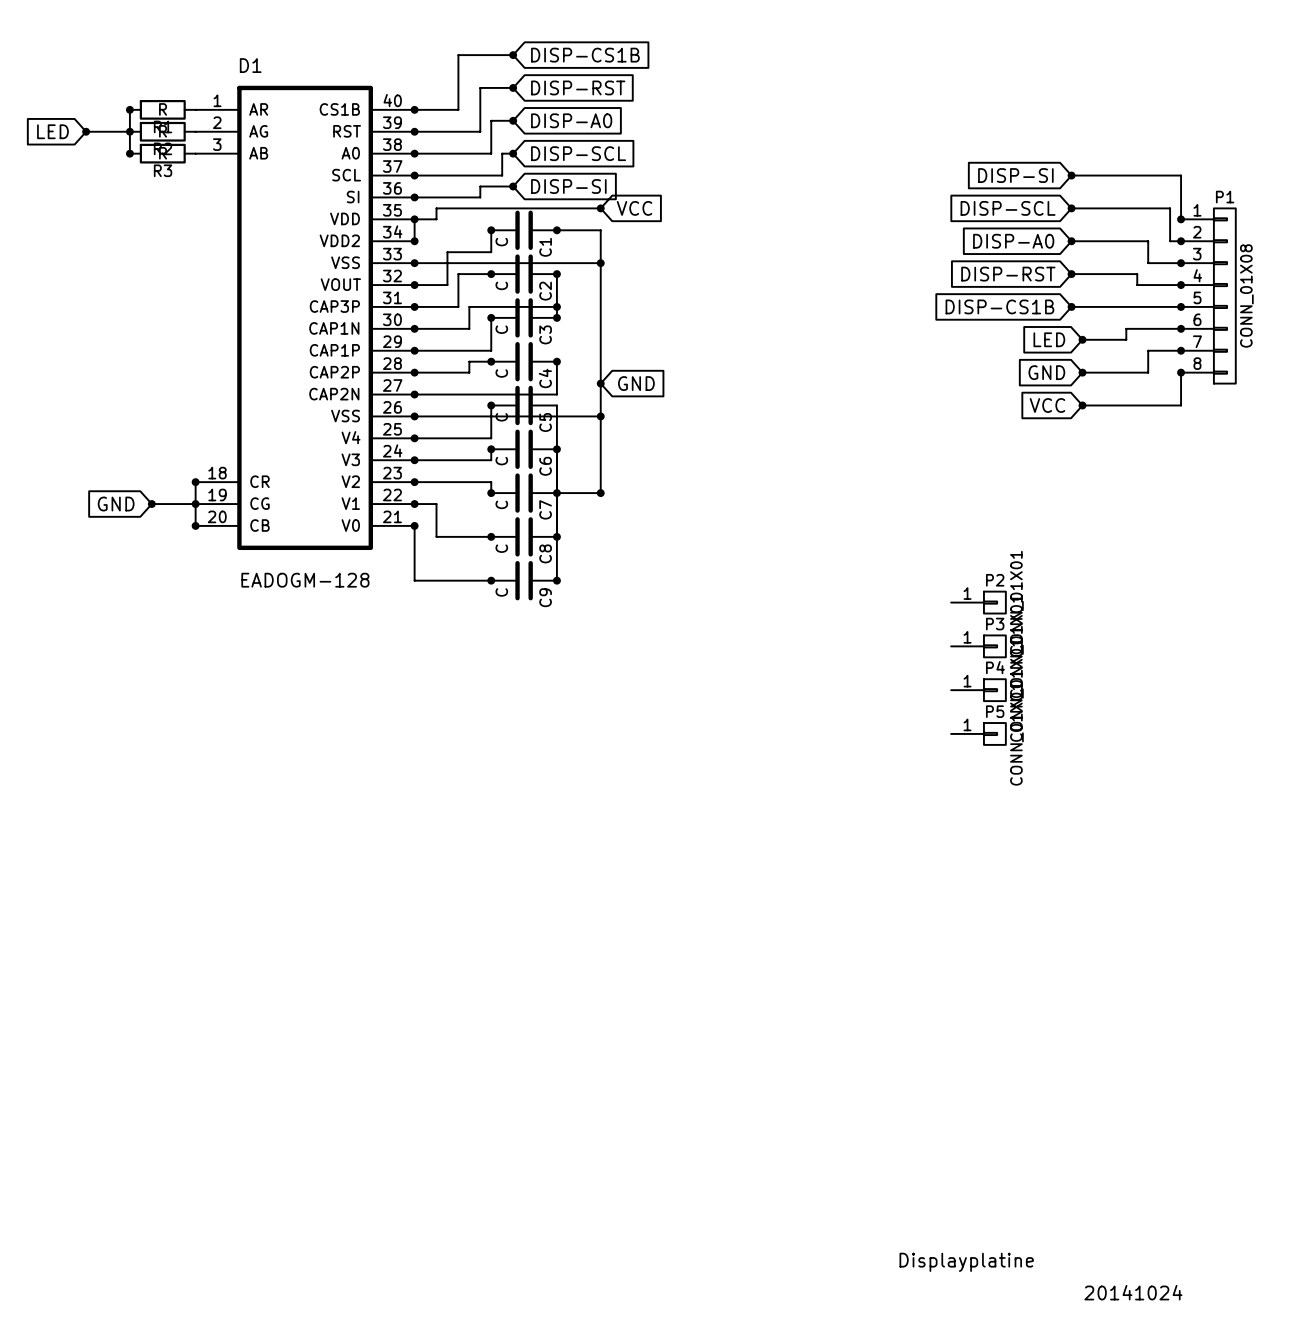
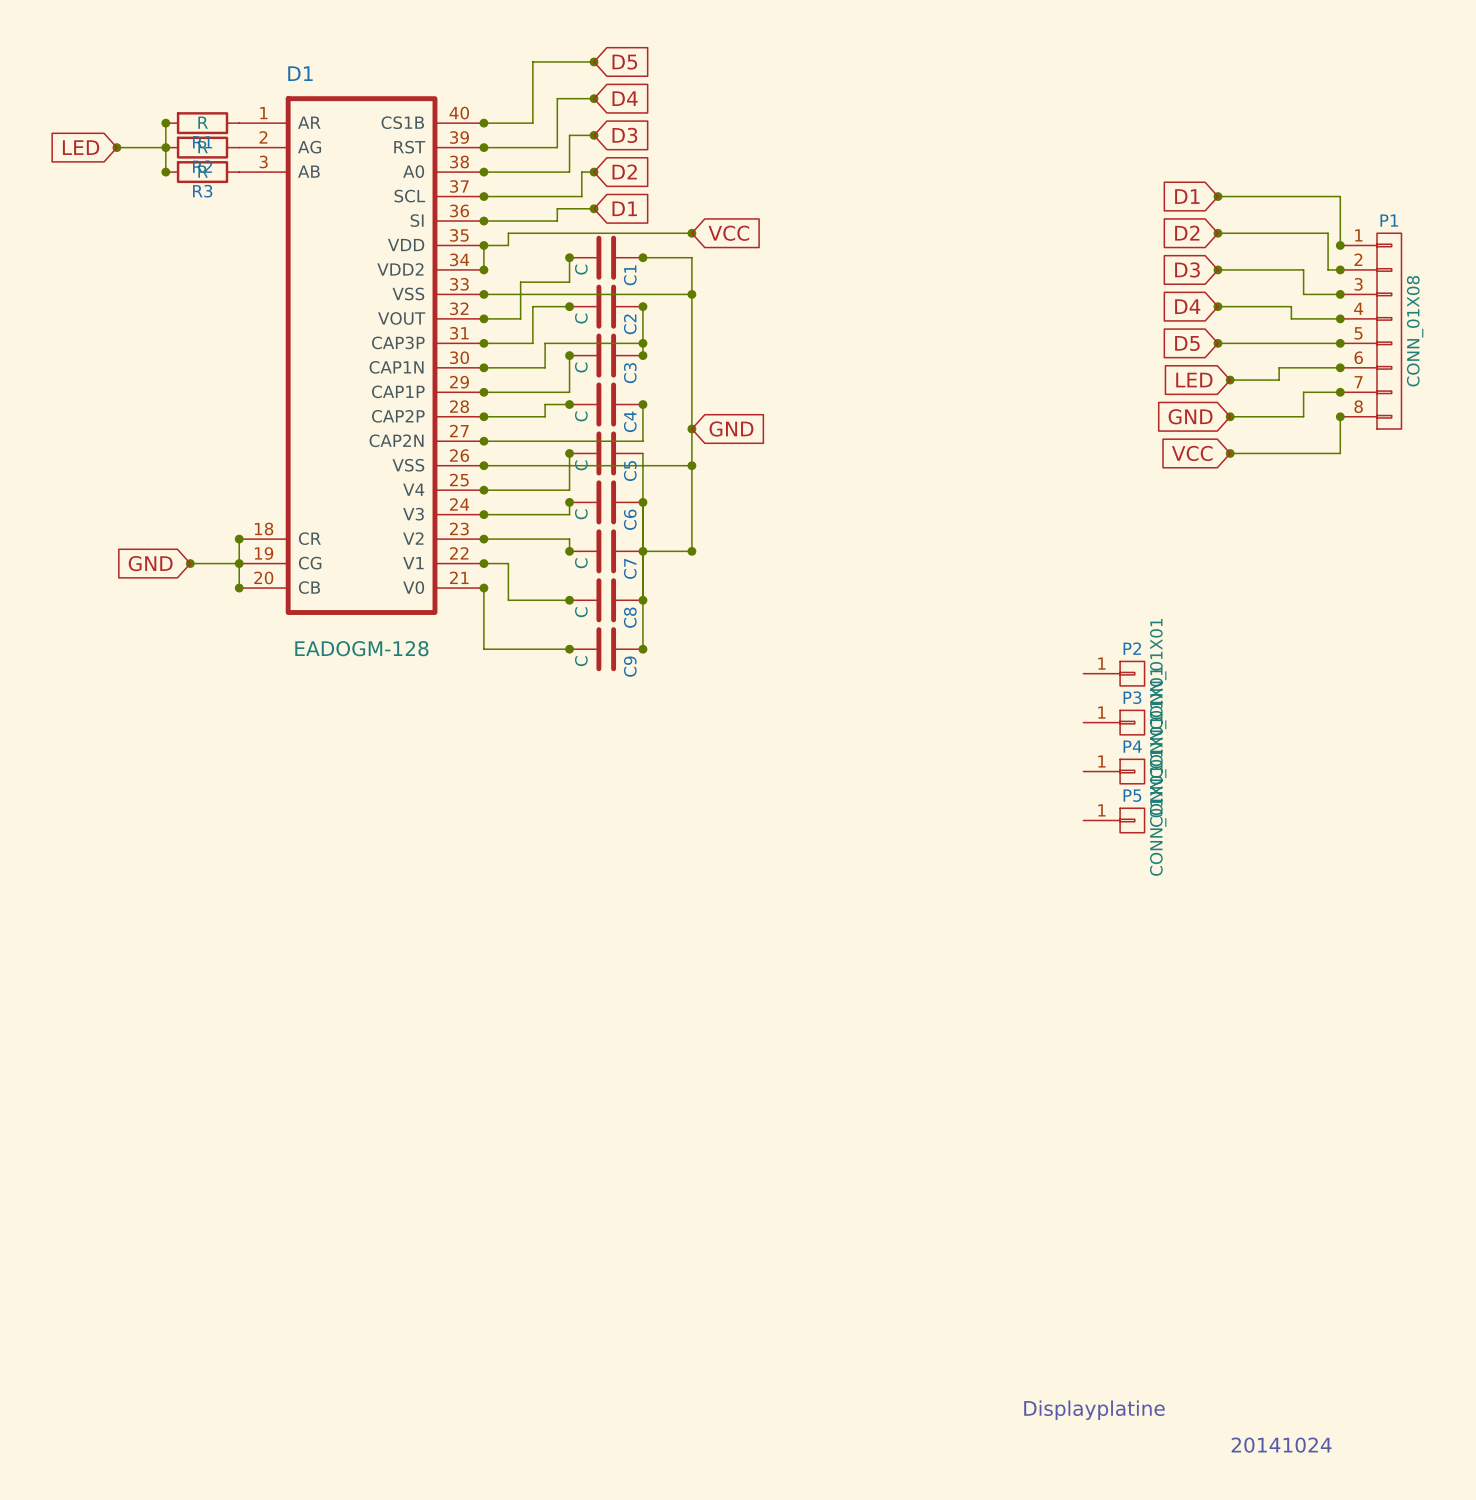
global label: DISP-CS1B (585, 55) -> D5 (624, 62)
global label: DISP-RST (578, 87) -> D4 (625, 98)
global label: DISP-A0 (571, 120) -> D3 (624, 135)
global label: DISP-SCL (578, 153) -> D2 (624, 171)
global label: DISP-SI (1015, 175) -> D1 (1187, 196)
global label: DISP-SI (568, 186) -> D1 (624, 208)
global label: DISP-SCL (1008, 208) -> D2 (1187, 233)
global label: DISP-A0 (1013, 241) -> D3 (1187, 269)
global label: DISP-RST (1008, 274) -> D4 (1187, 306)
global label: DISP-CS1B (999, 306) -> D5 (1187, 343)

